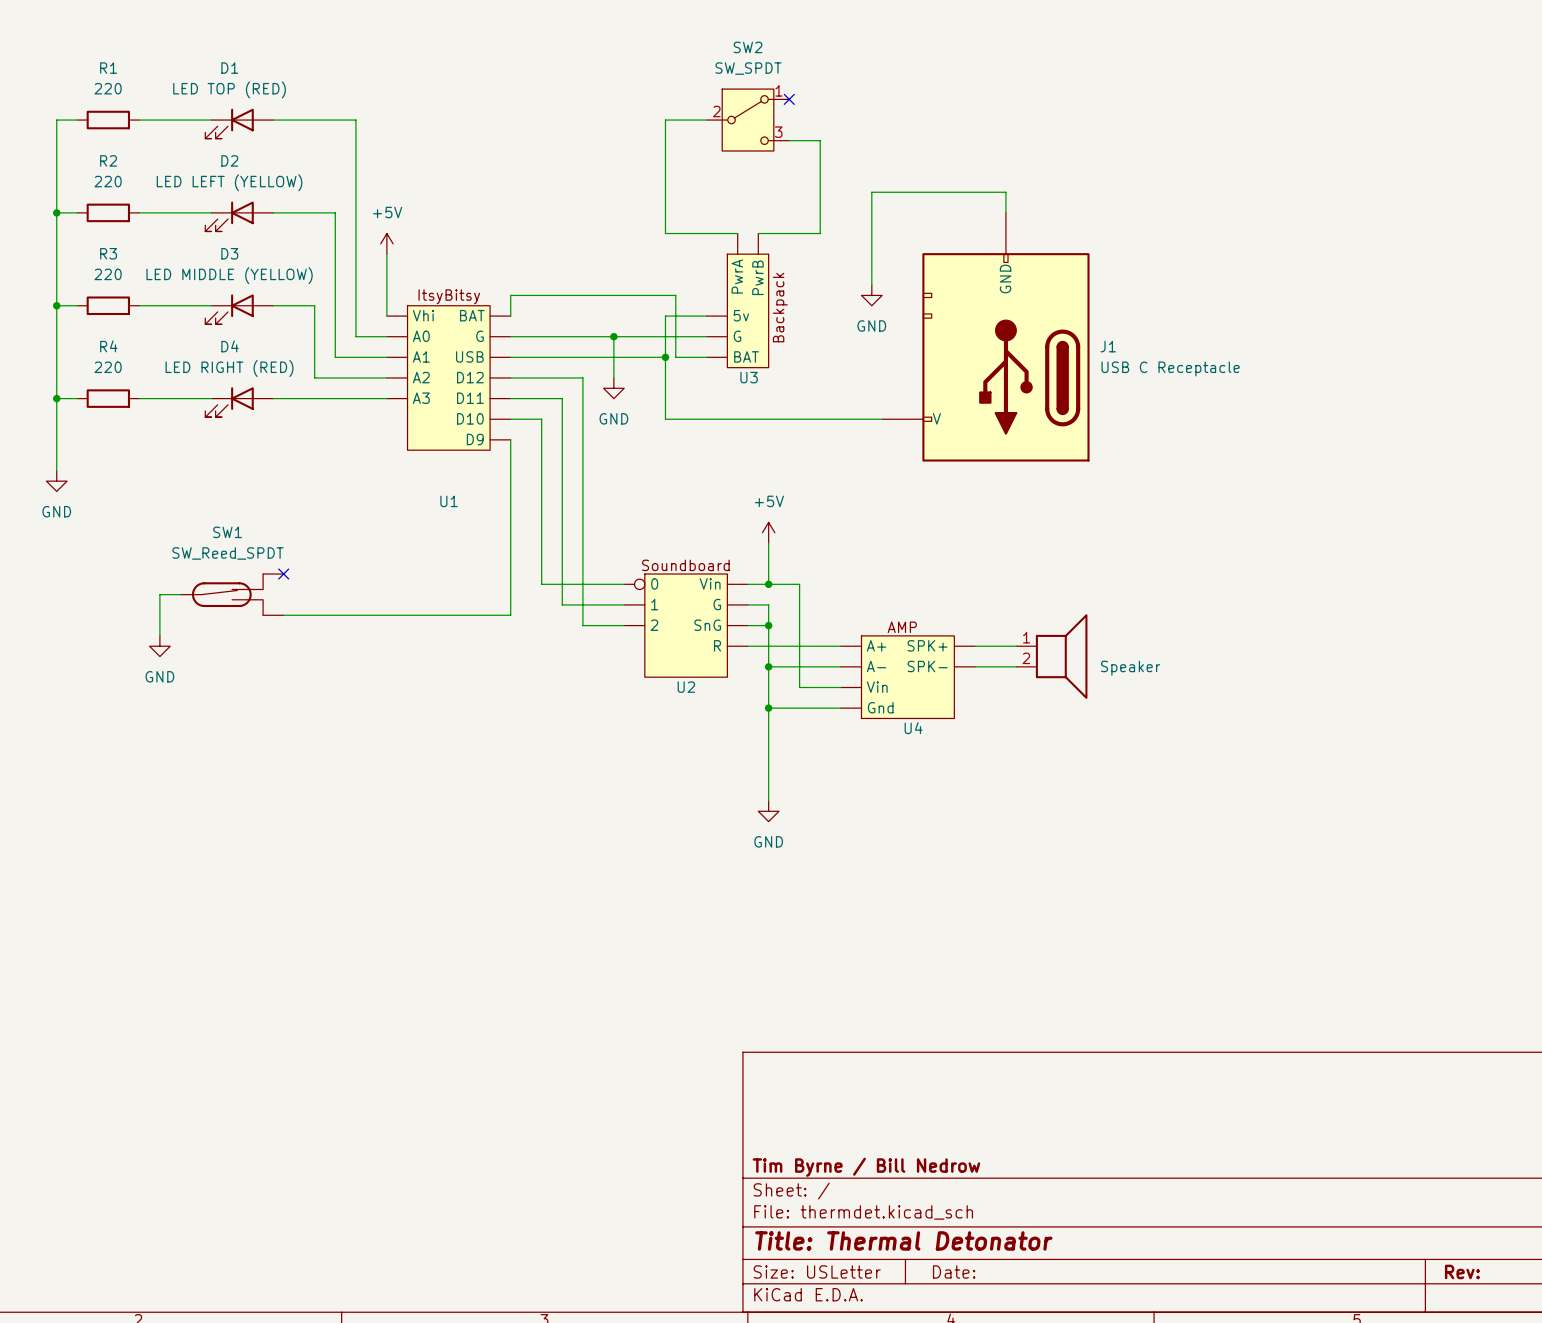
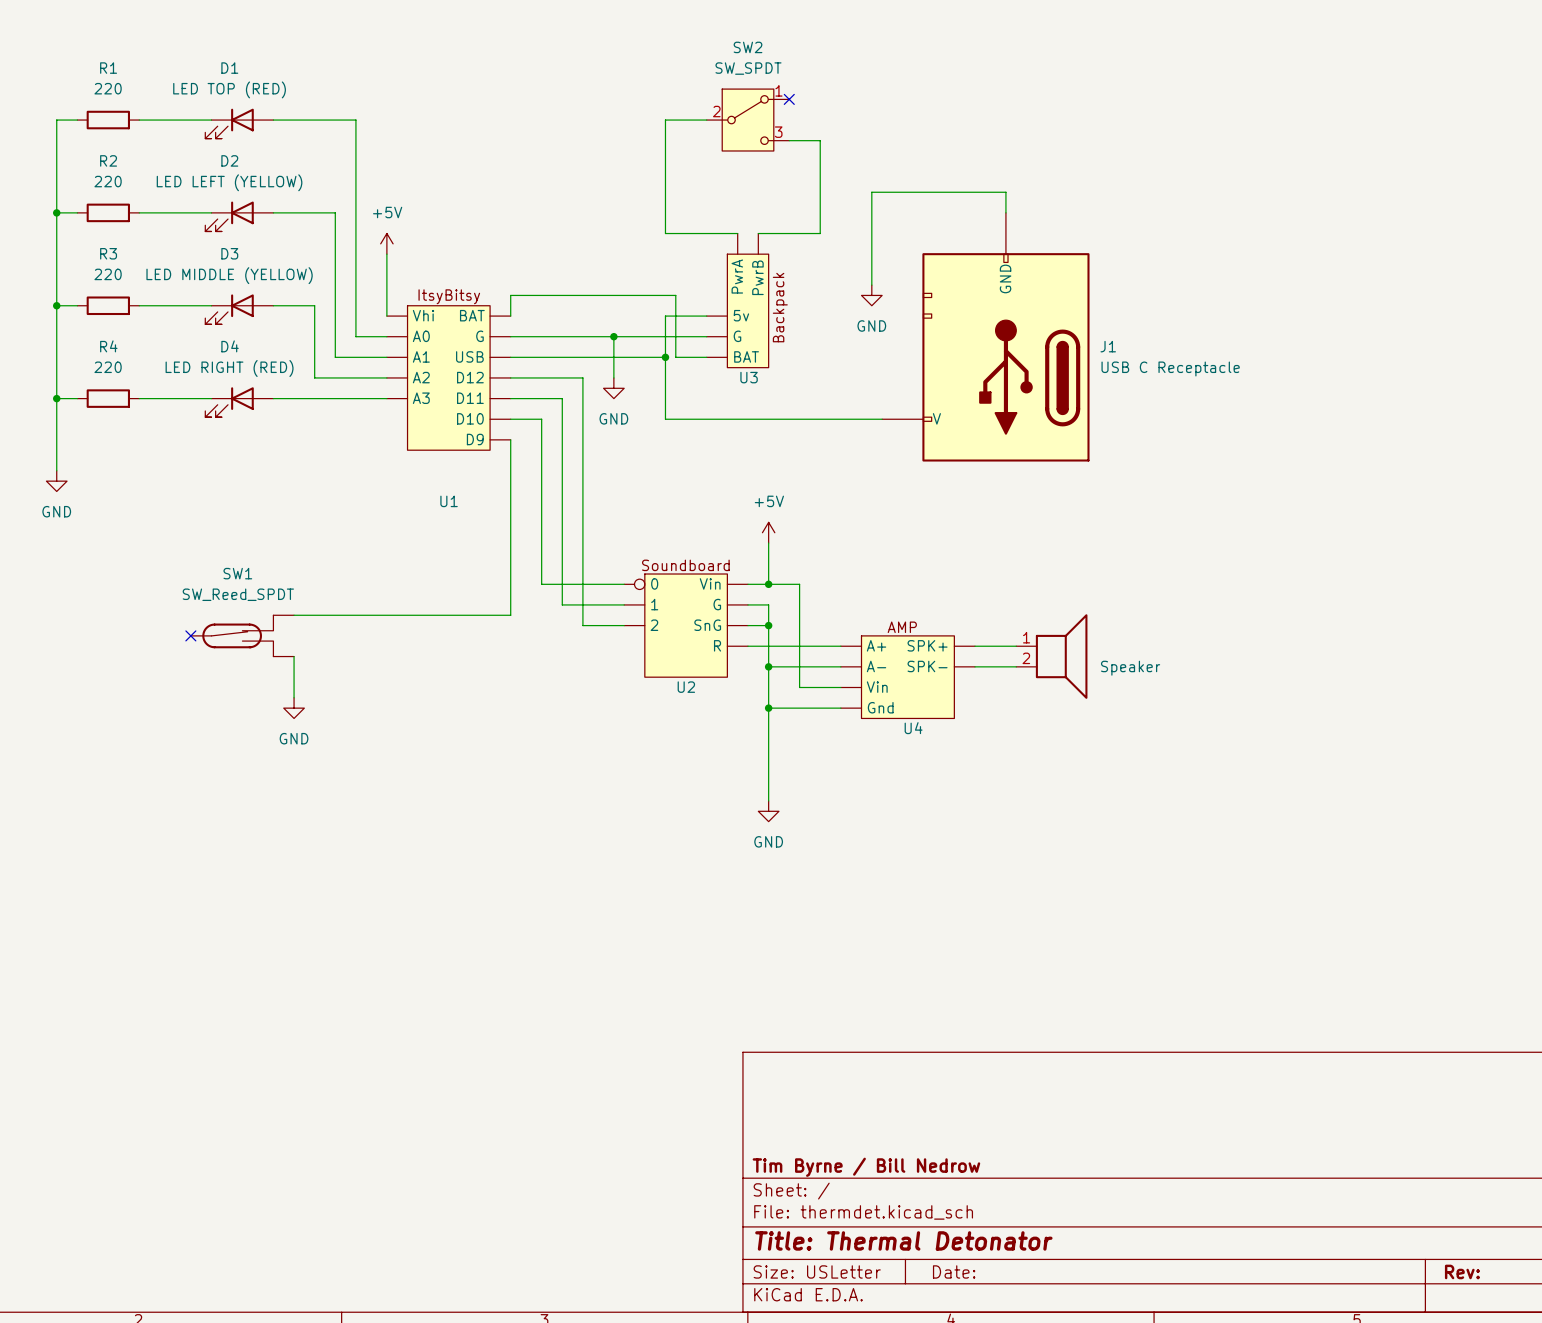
no-connect mark: (283, 574) -> none
wire: (180, 594) (159, 594) (159, 635) -> none
SW1 position: (232, 594) -> (242, 635)
no-connect mark: none -> (190, 635)
power symbol position: GND (159, 646) -> GND (294, 708)
wire: none -> (294, 656) (294, 697)

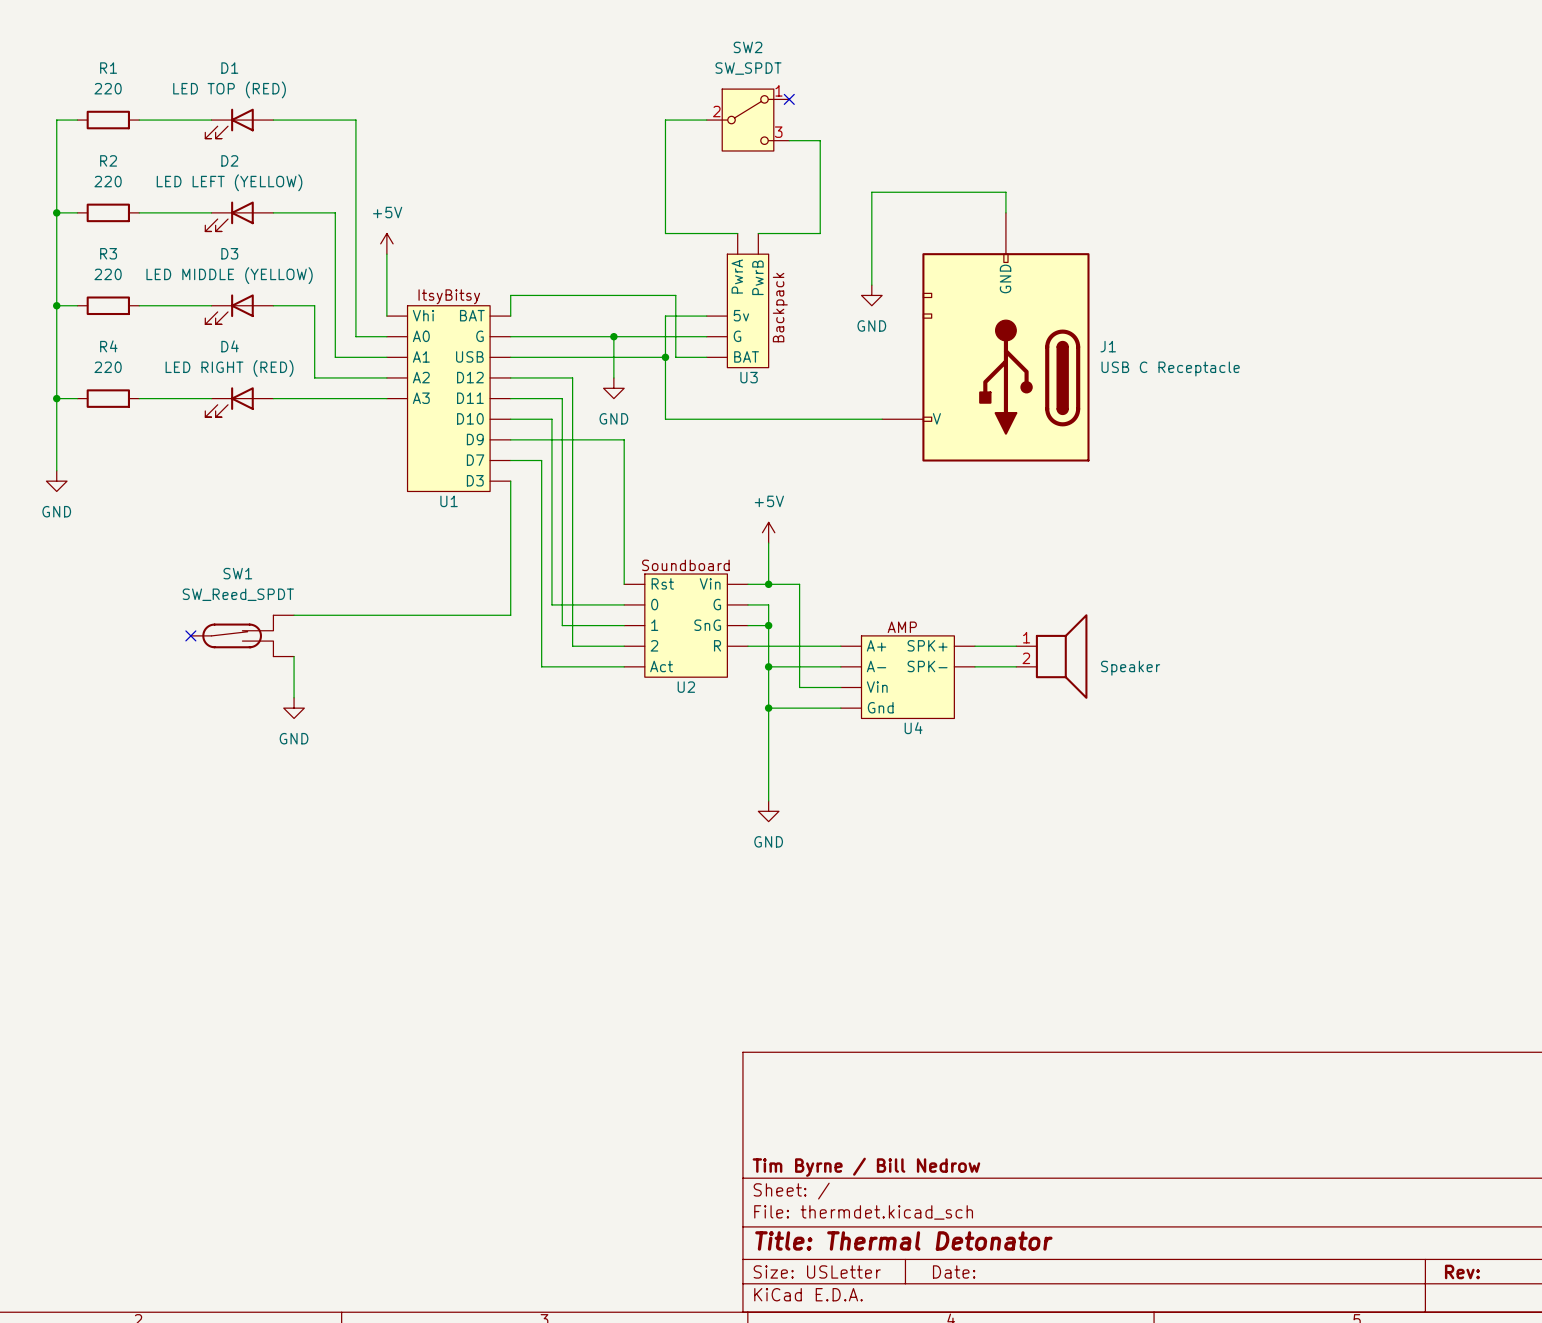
U1 symbol: [386, 305, 511, 451] -> [386, 305, 511, 492]
wire: (572, 377) (582, 377) (582, 625) -> (572, 377) (572, 646) (624, 646)
wire: (541, 419) (541, 460) -> (510, 460) (541, 460)
wire: none -> (541, 419) (551, 419) (551, 604) (562, 604) (562, 625) (582, 625)
wire: (510, 439) (510, 481) -> (510, 439) (624, 439) (624, 584)
U2 symbol: [624, 574, 749, 678] -> [624, 574, 749, 678]
wire: (541, 584) (624, 584) -> (541, 584) (541, 666) (624, 666)

